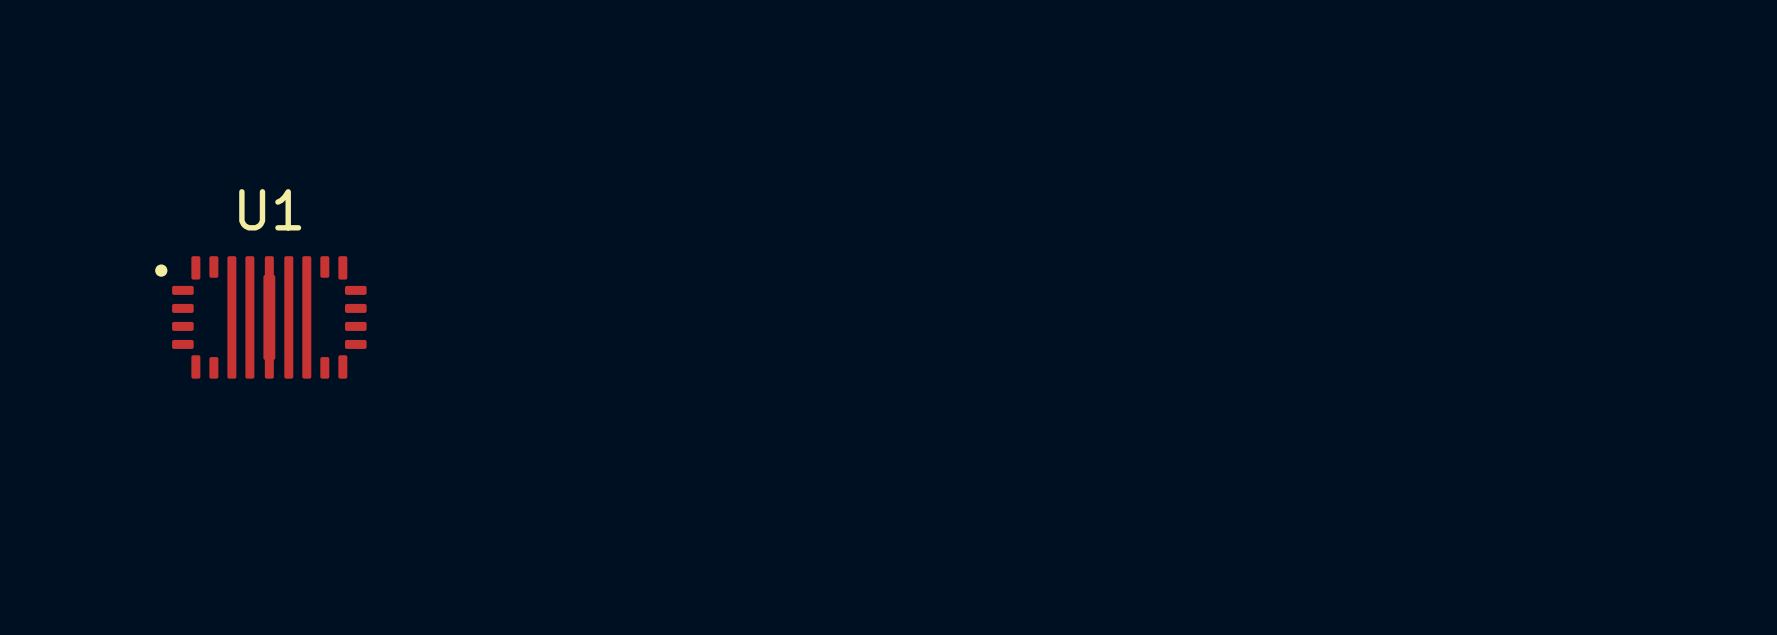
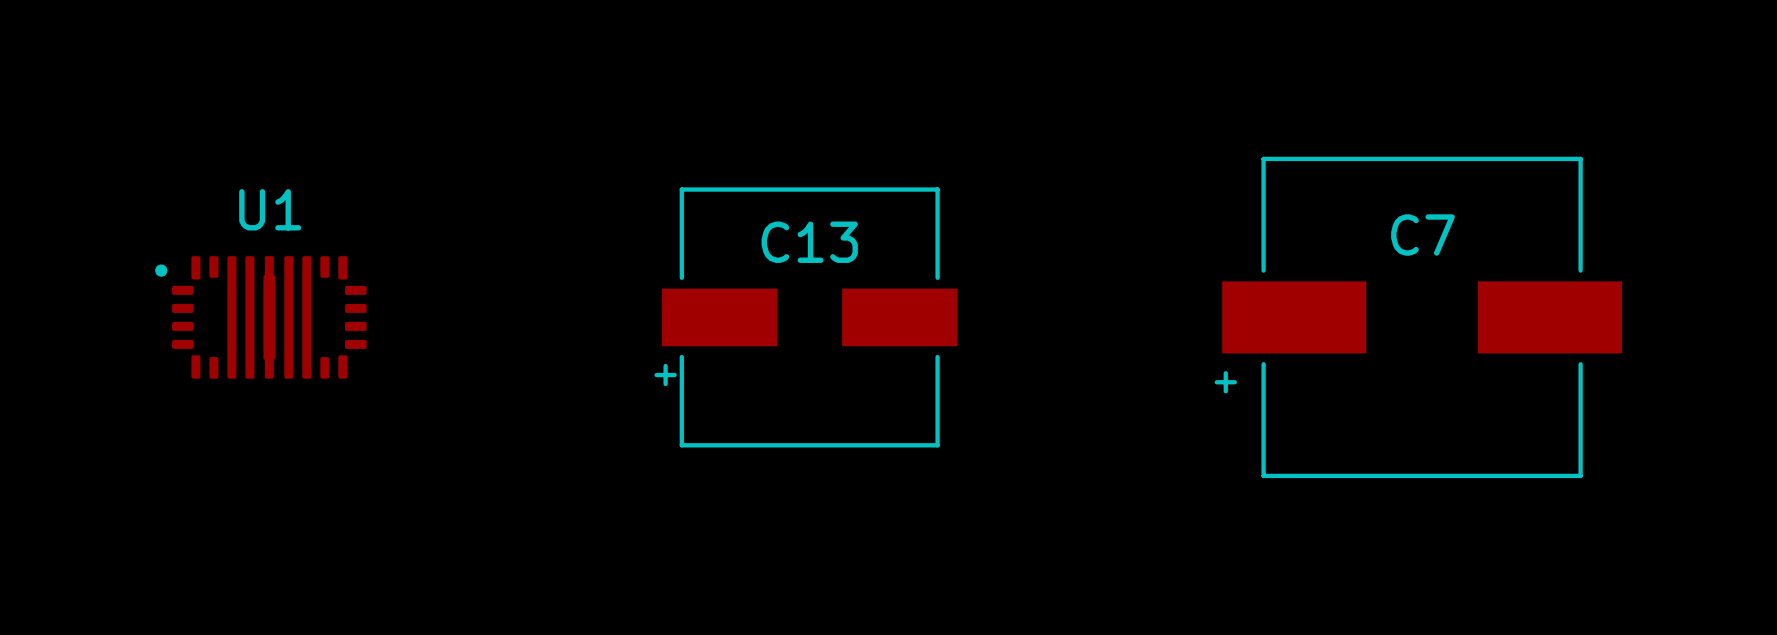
C13: none -> (805, 317)
C7: none -> (1418, 317)

